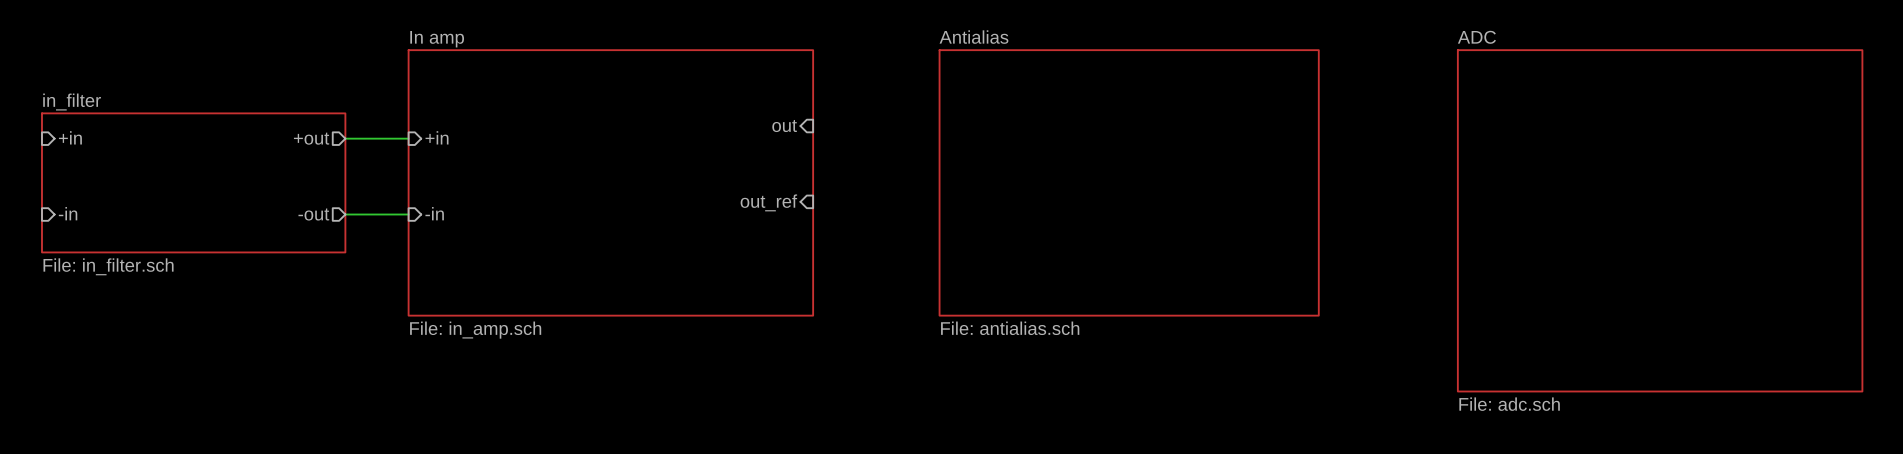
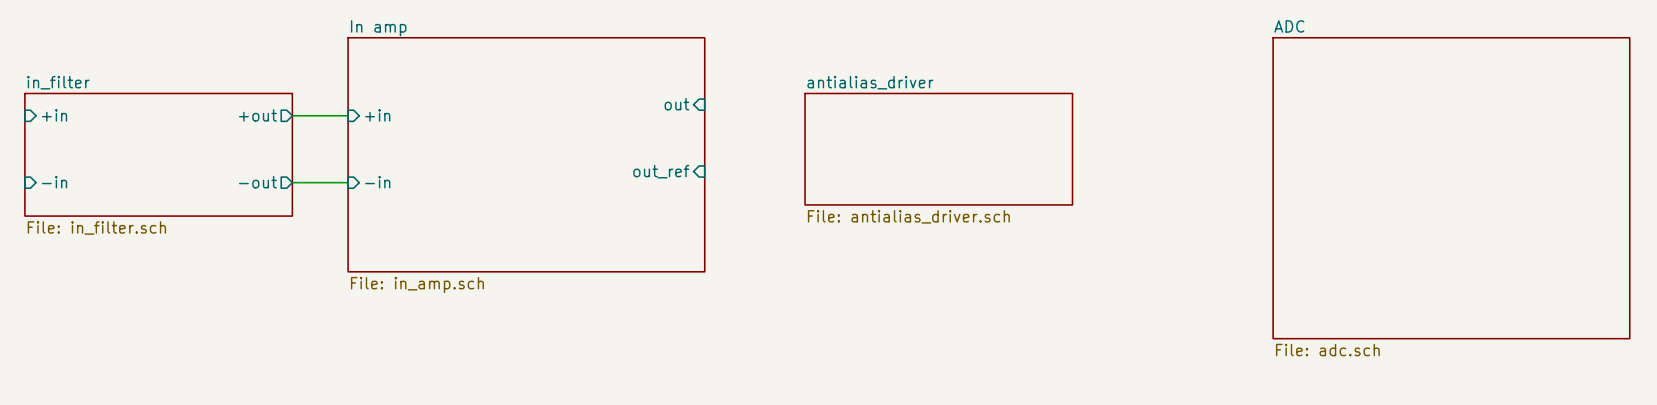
sheet antialias_driver: none -> File: antialias_driver.sch (938, 149)
sheet Antialias: File: antialias.sch (1129, 182) -> none

